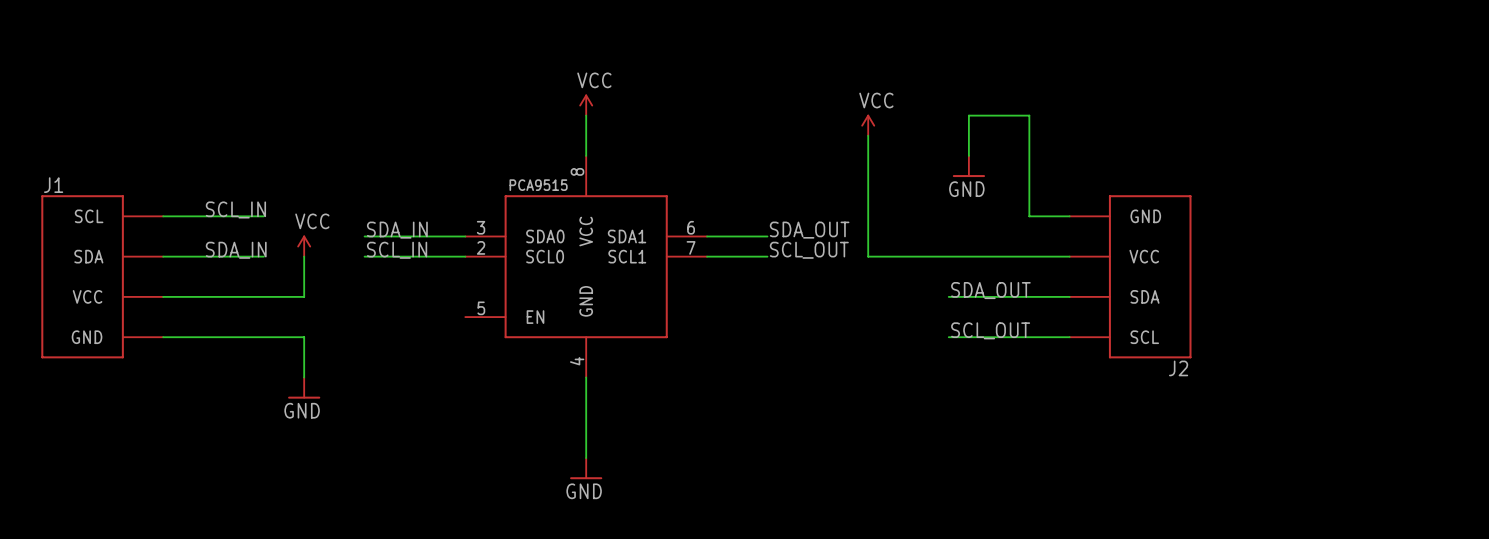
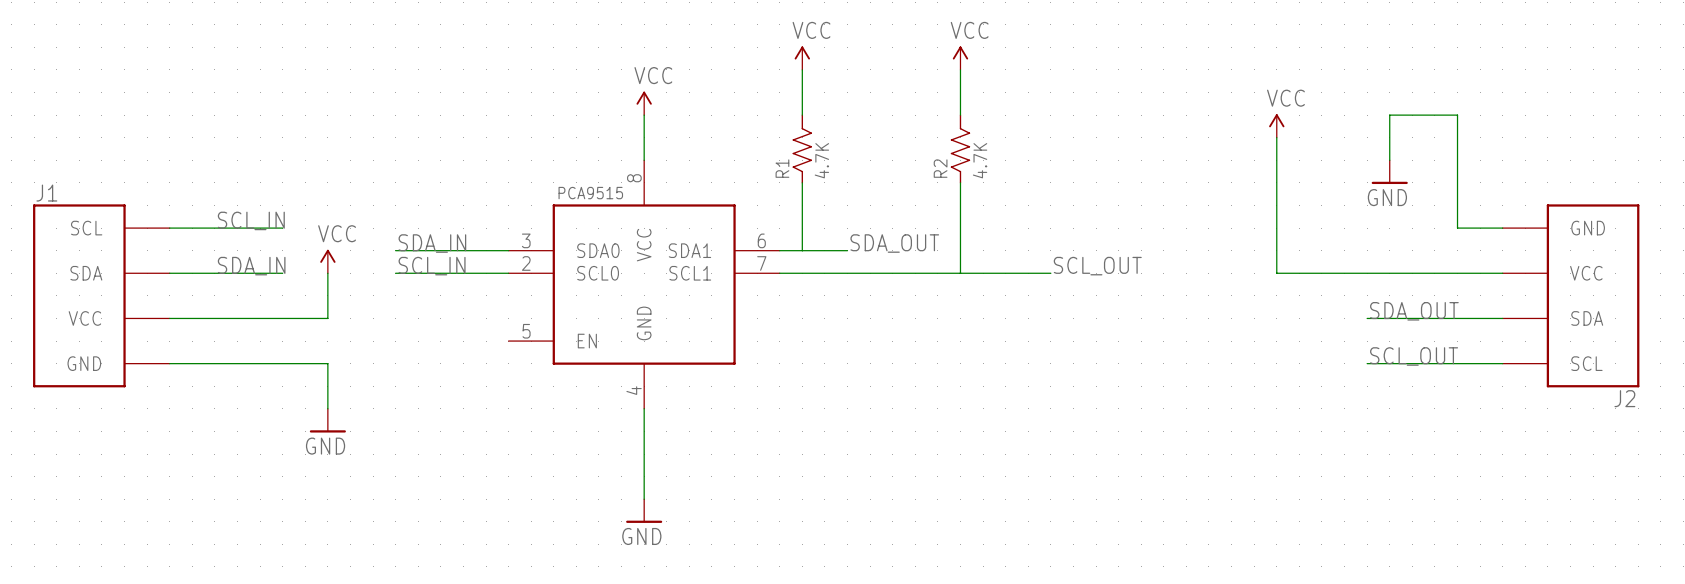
power symbol: none -> VCC (802, 58)
wire: none -> (802, 69) (802, 115)
power symbol position: VCC (868, 125) -> VCC (960, 58)
power symbol: none -> VCC (1276, 125)
wire: (868, 135) (868, 176) -> (960, 69) (960, 115)
wire: none -> (1276, 137) (1276, 273) (1502, 273)
R1: none -> 4.7K (802, 149)
R2: none -> 4.7K (960, 149)
wire: (968, 155) (968, 115) (1029, 115) (1029, 216) (1069, 216) -> none
wire: none -> (1389, 160) (1389, 115) (1457, 115) (1457, 228) (1502, 228)
power symbol: GND (968, 166) -> none
power symbol: none -> GND (1389, 172)
wire: none -> (802, 182) (802, 250)
label: SCL_OUT (809, 250) -> none
wire: none -> (847, 273) (960, 273)
wire: (948, 256) (1069, 256) -> none
J2 position: (1130, 276) -> (1571, 295)
label: SDA_OUT (990, 290) -> none
label: none -> SDA_OUT (1414, 311)
wire: (948, 296) (1069, 296) -> none
wire: none -> (1367, 318) (1502, 318)
label position: SCL_OUT (990, 330) -> SCL_OUT (1097, 266)
label: none -> SCL_OUT (1414, 356)
wire: (948, 337) (1069, 337) -> none
wire: none -> (1367, 363) (1502, 363)

